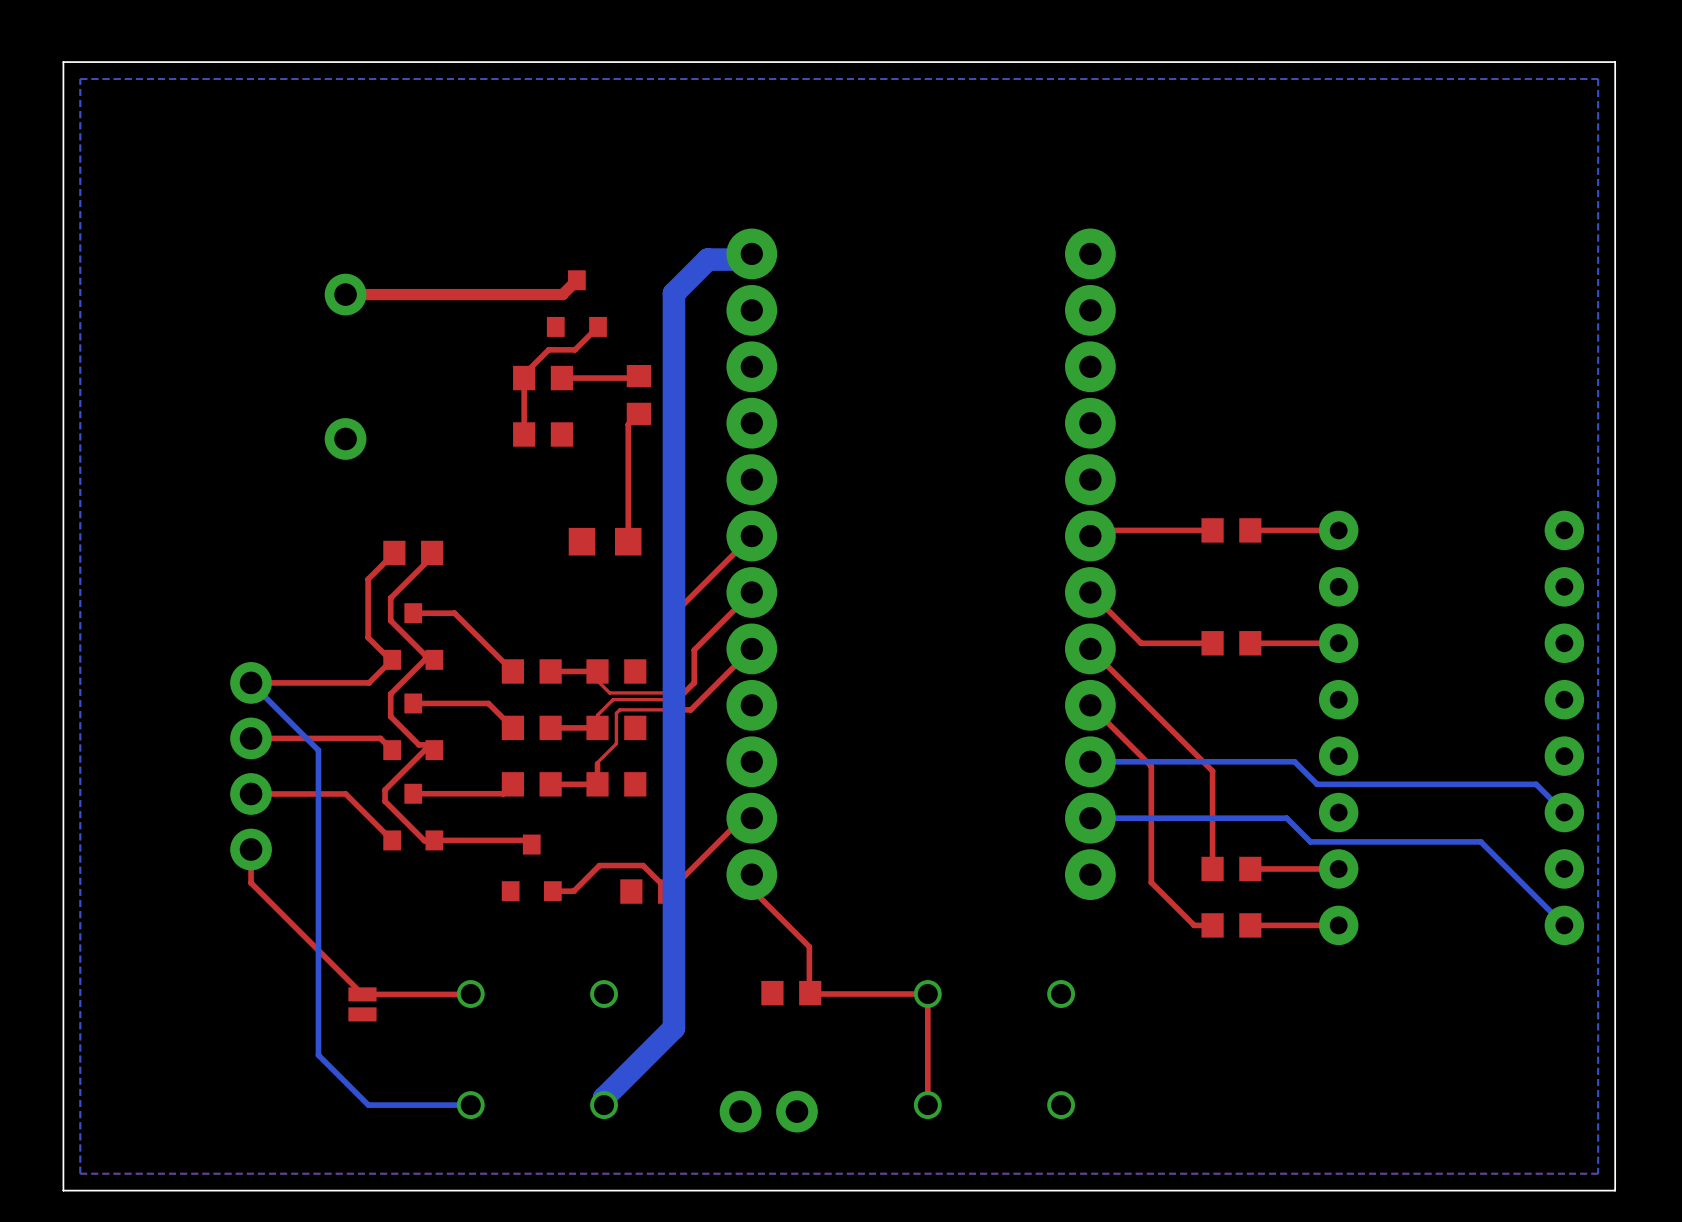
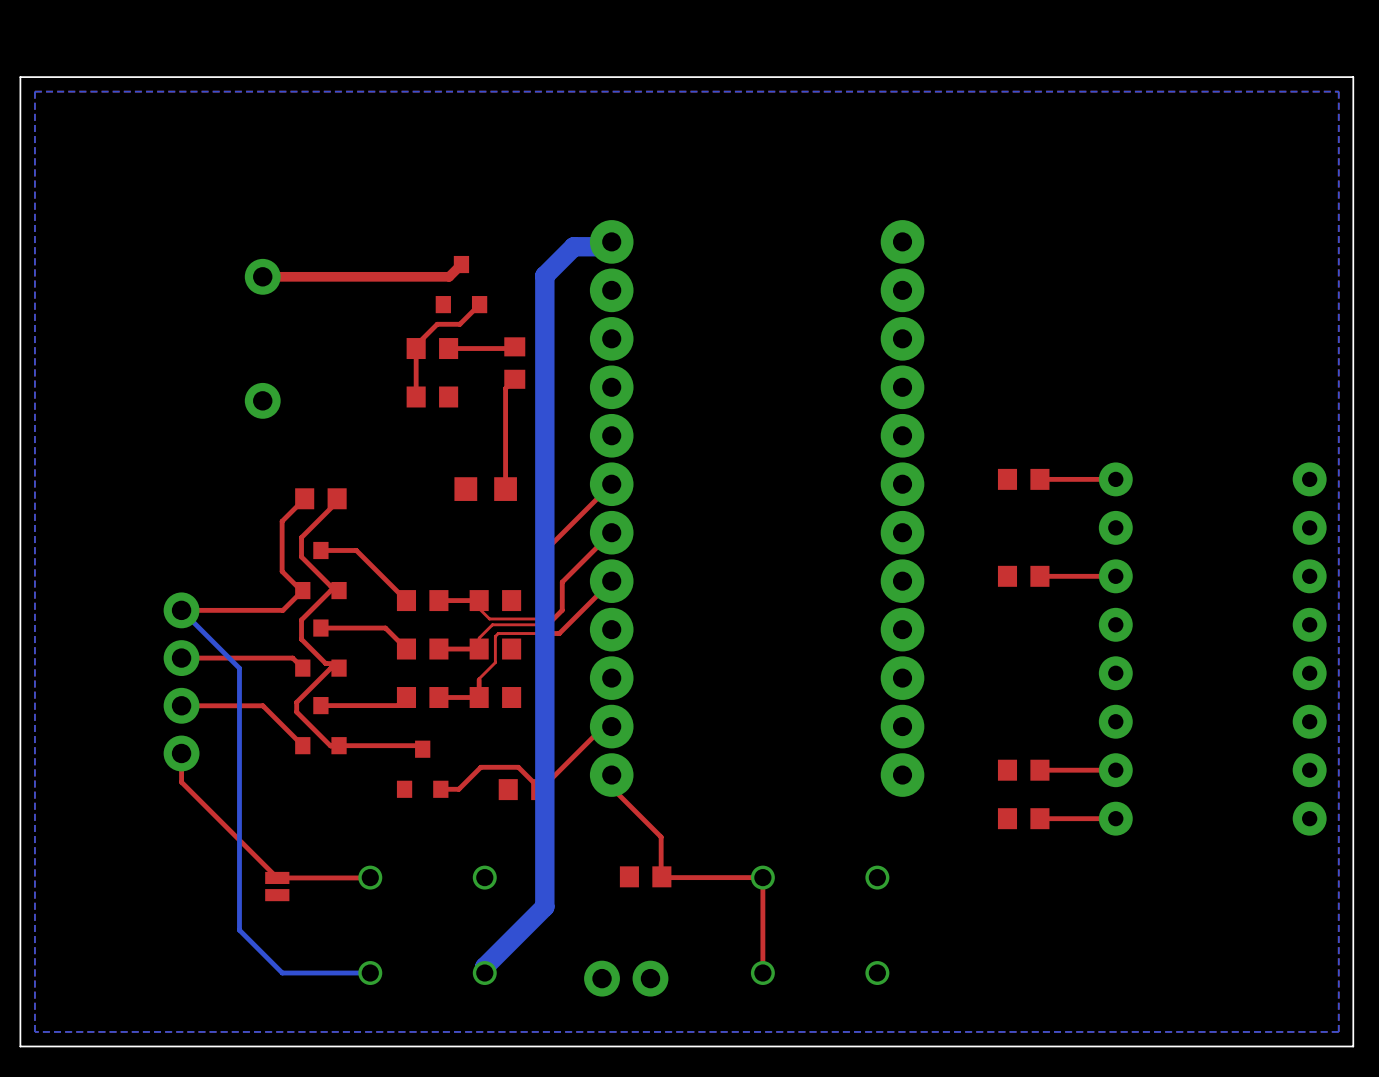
top track: (1212, 530) (1096, 530) (1090, 536) -> none
top track: (1090, 592) (1141, 643) (1212, 643) -> none
top track: (1090, 648) (1212, 771) (1212, 868) -> none
top track: (1090, 705) (1151, 766) (1151, 882) (1194, 925) (1212, 925) -> none
bottom track: (1090, 761) (1294, 761) (1317, 784) (1536, 784) (1564, 812) -> none
bottom track: (1090, 818) (1286, 818) (1310, 841) (1480, 841) (1564, 925) -> none

